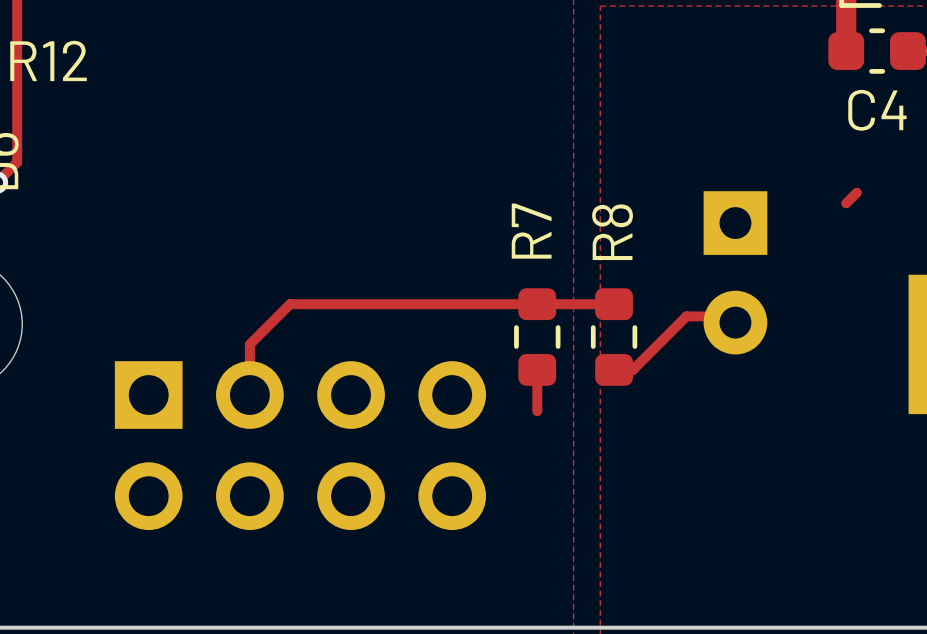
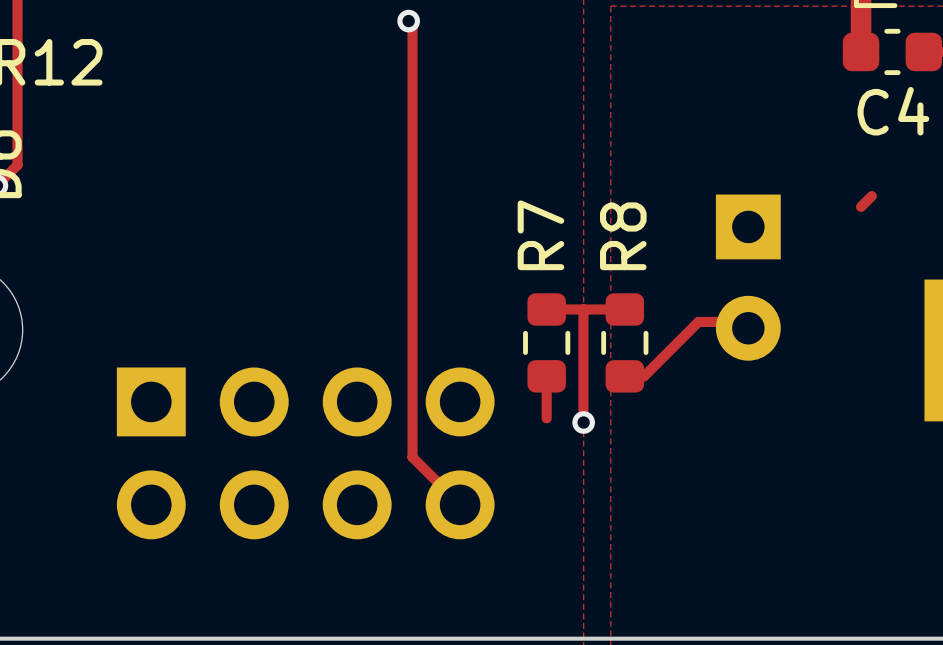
track: none -> (408, 21) (412, 24) (412, 457) (460, 504)
via: none -> (408, 21)
track: (537, 304) (290, 304) (249, 344) (249, 395) -> none
track: none -> (583, 309) (583, 422)
via: none -> (583, 422)

